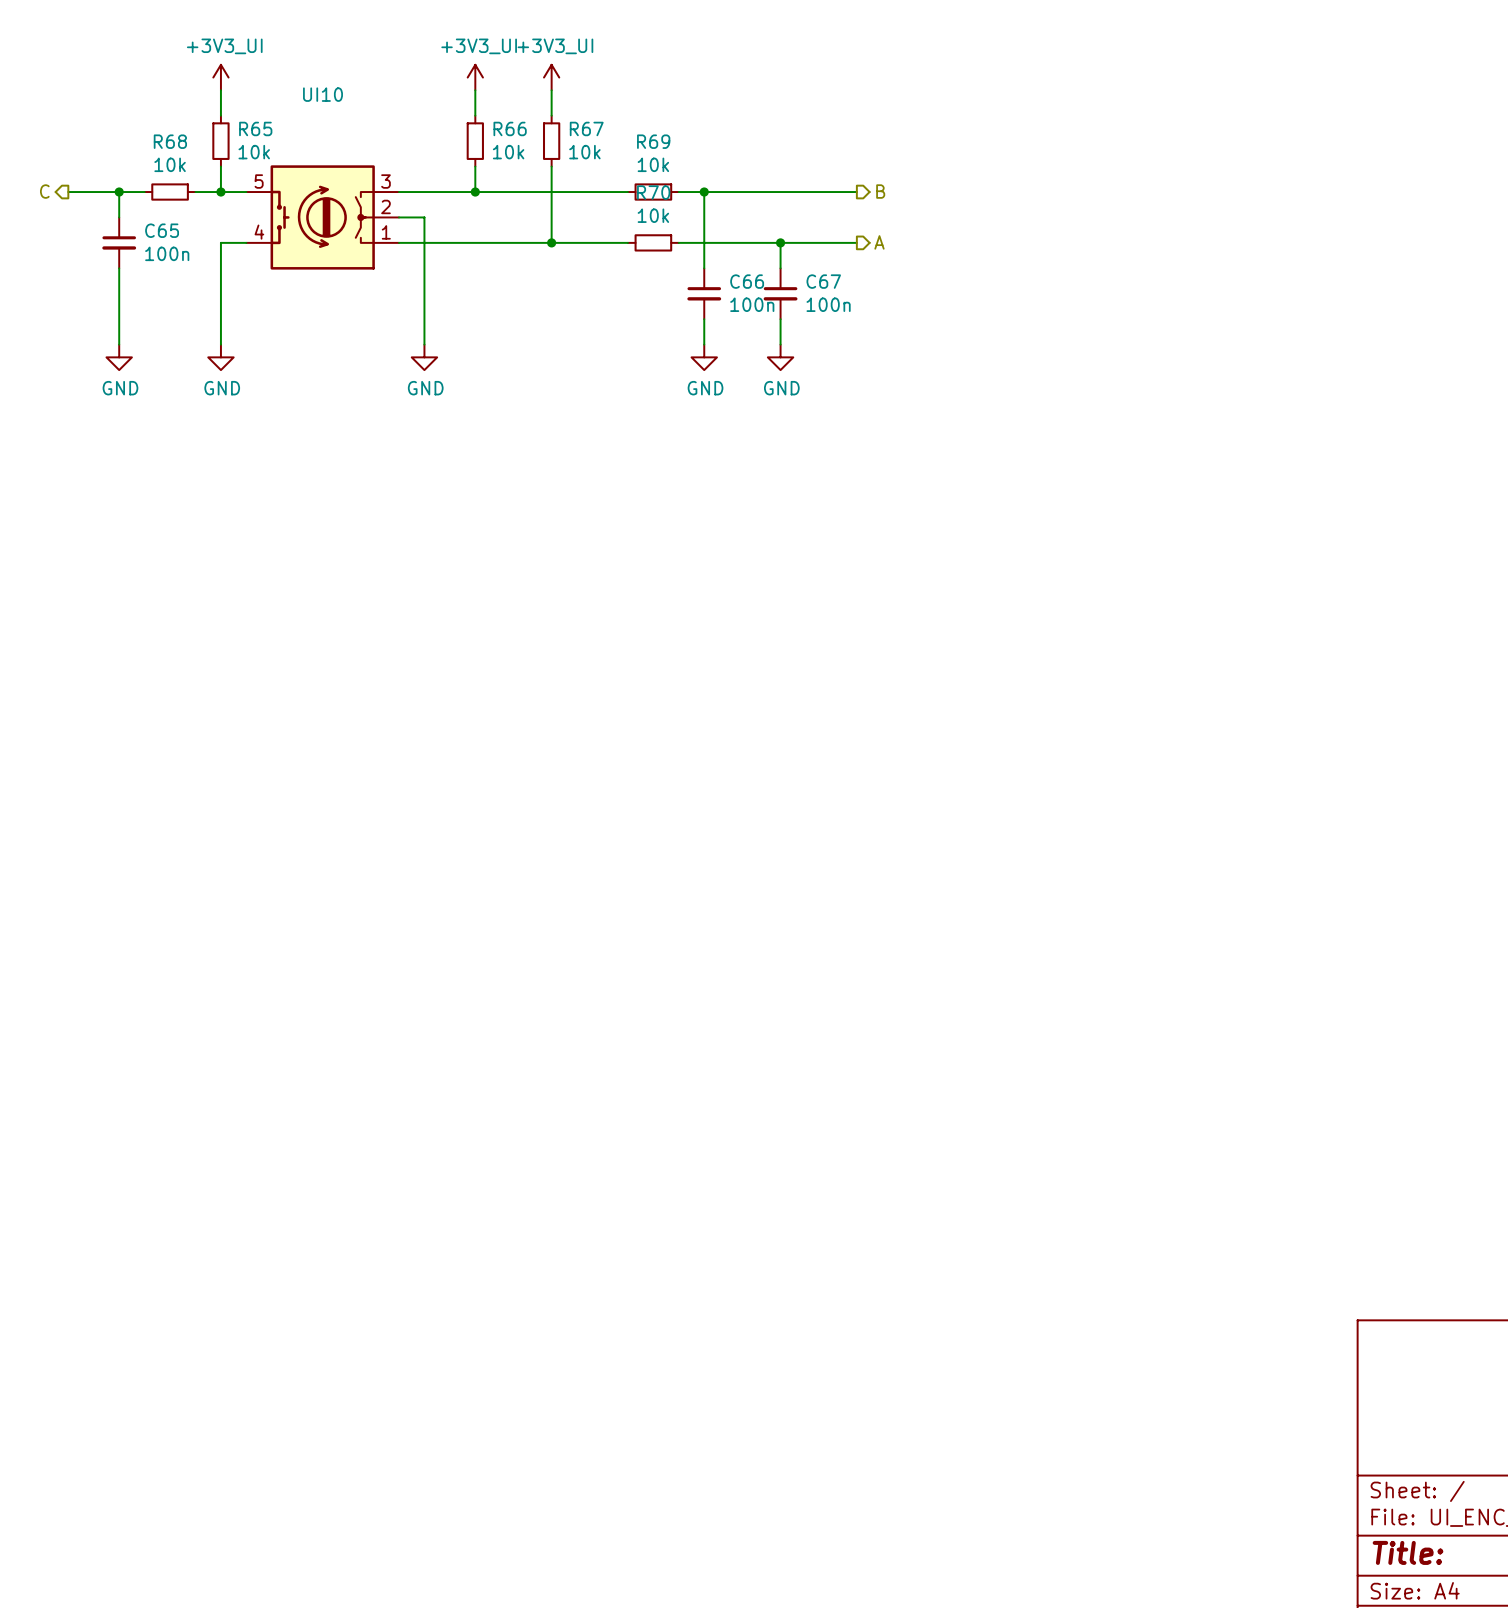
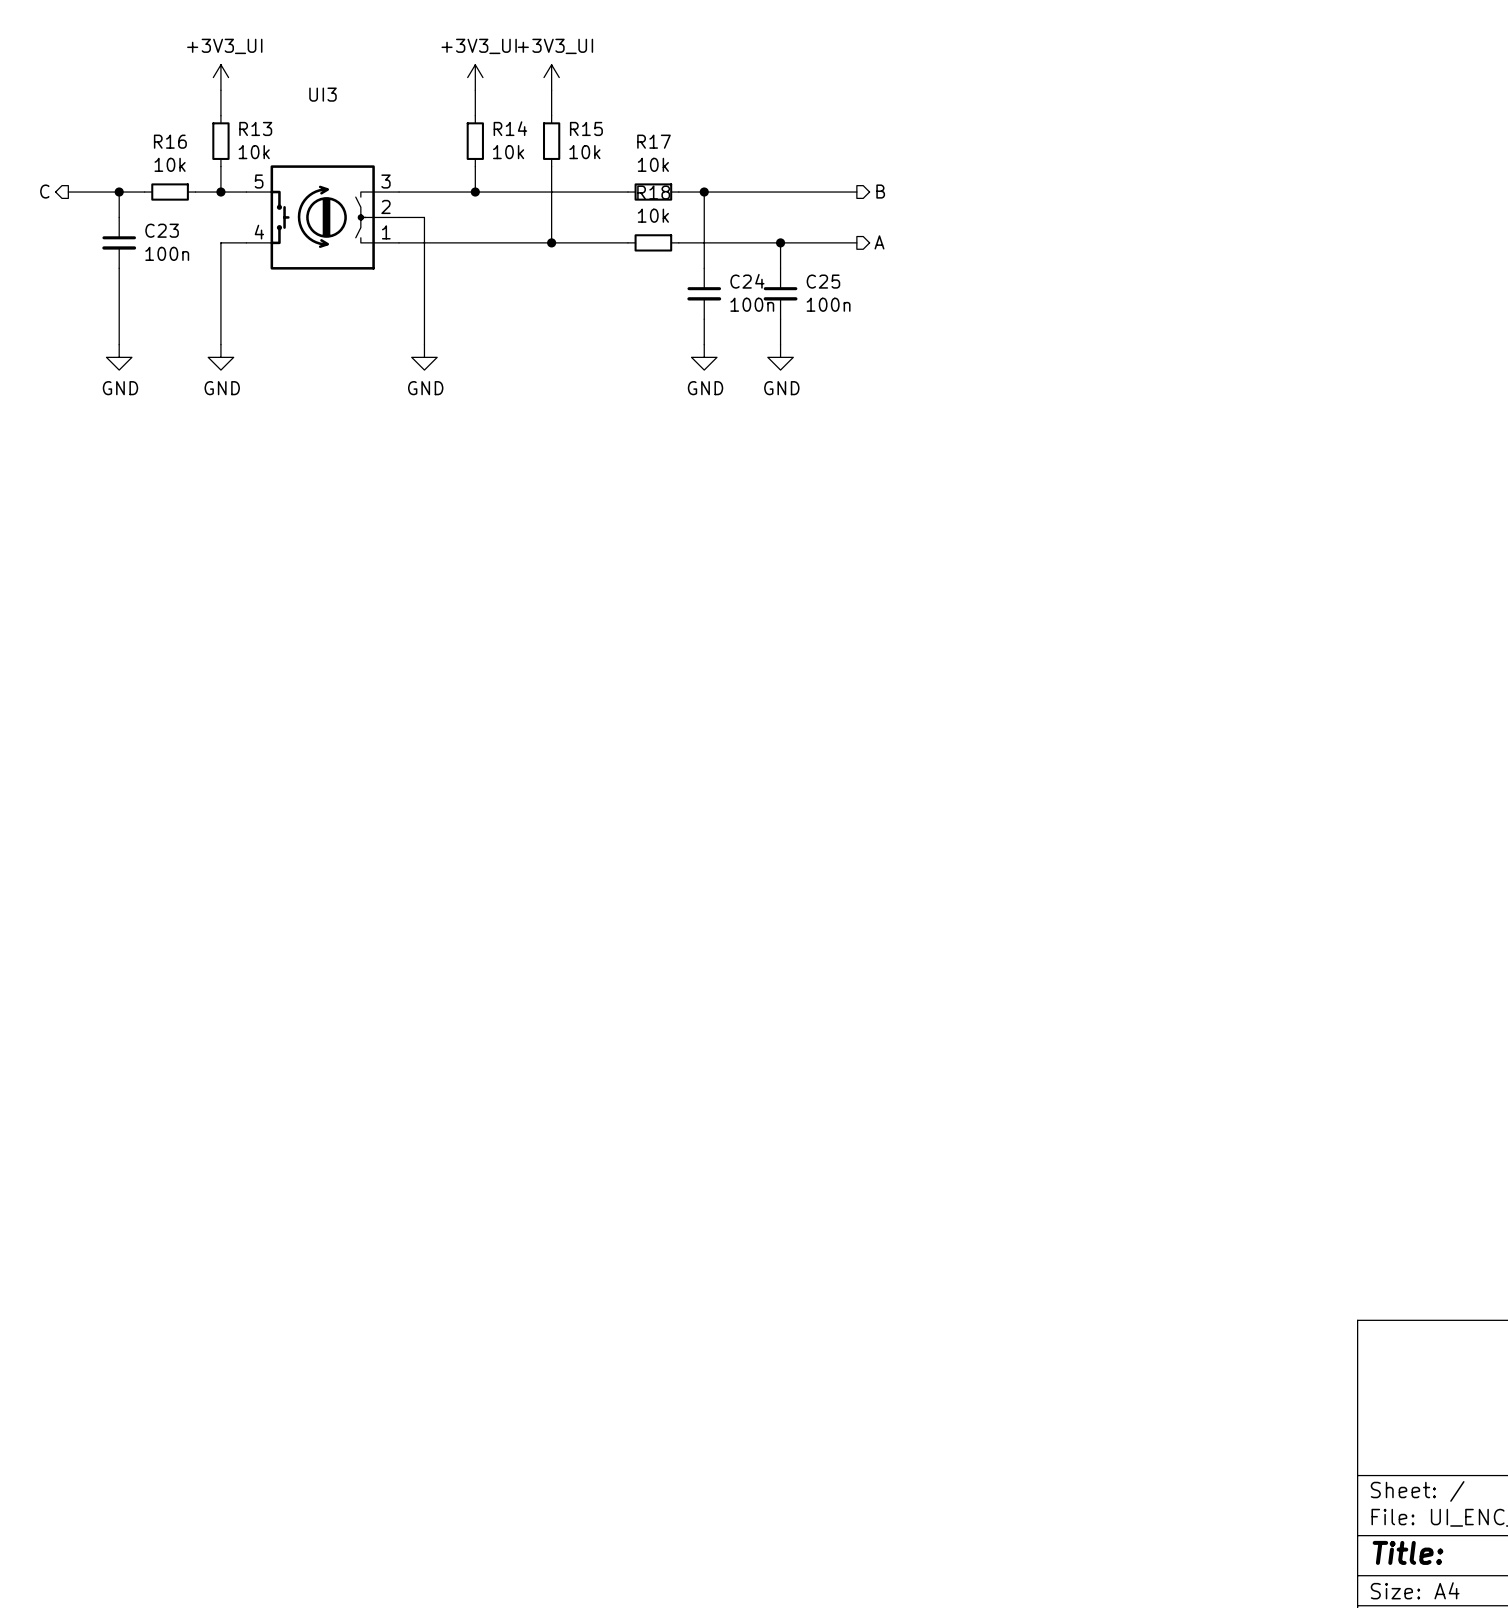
UI10 name: UI10 (323, 94) -> UI3 (323, 94)
R65 name: R65 (255, 128) -> R13 (255, 128)
R66 name: R66 (510, 128) -> R14 (510, 128)
R67 name: R67 (586, 128) -> R15 (586, 128)
R68 name: R68 (170, 141) -> R16 (170, 141)
R69 name: R69 (653, 141) -> R17 (653, 141)
R70 name: R70 (653, 192) -> R18 (653, 192)
C65 name: C65 (162, 230) -> C23 (162, 230)
C66 name: C66 (747, 281) -> C24 (747, 281)
C67 name: C67 (823, 281) -> C25 (823, 281)

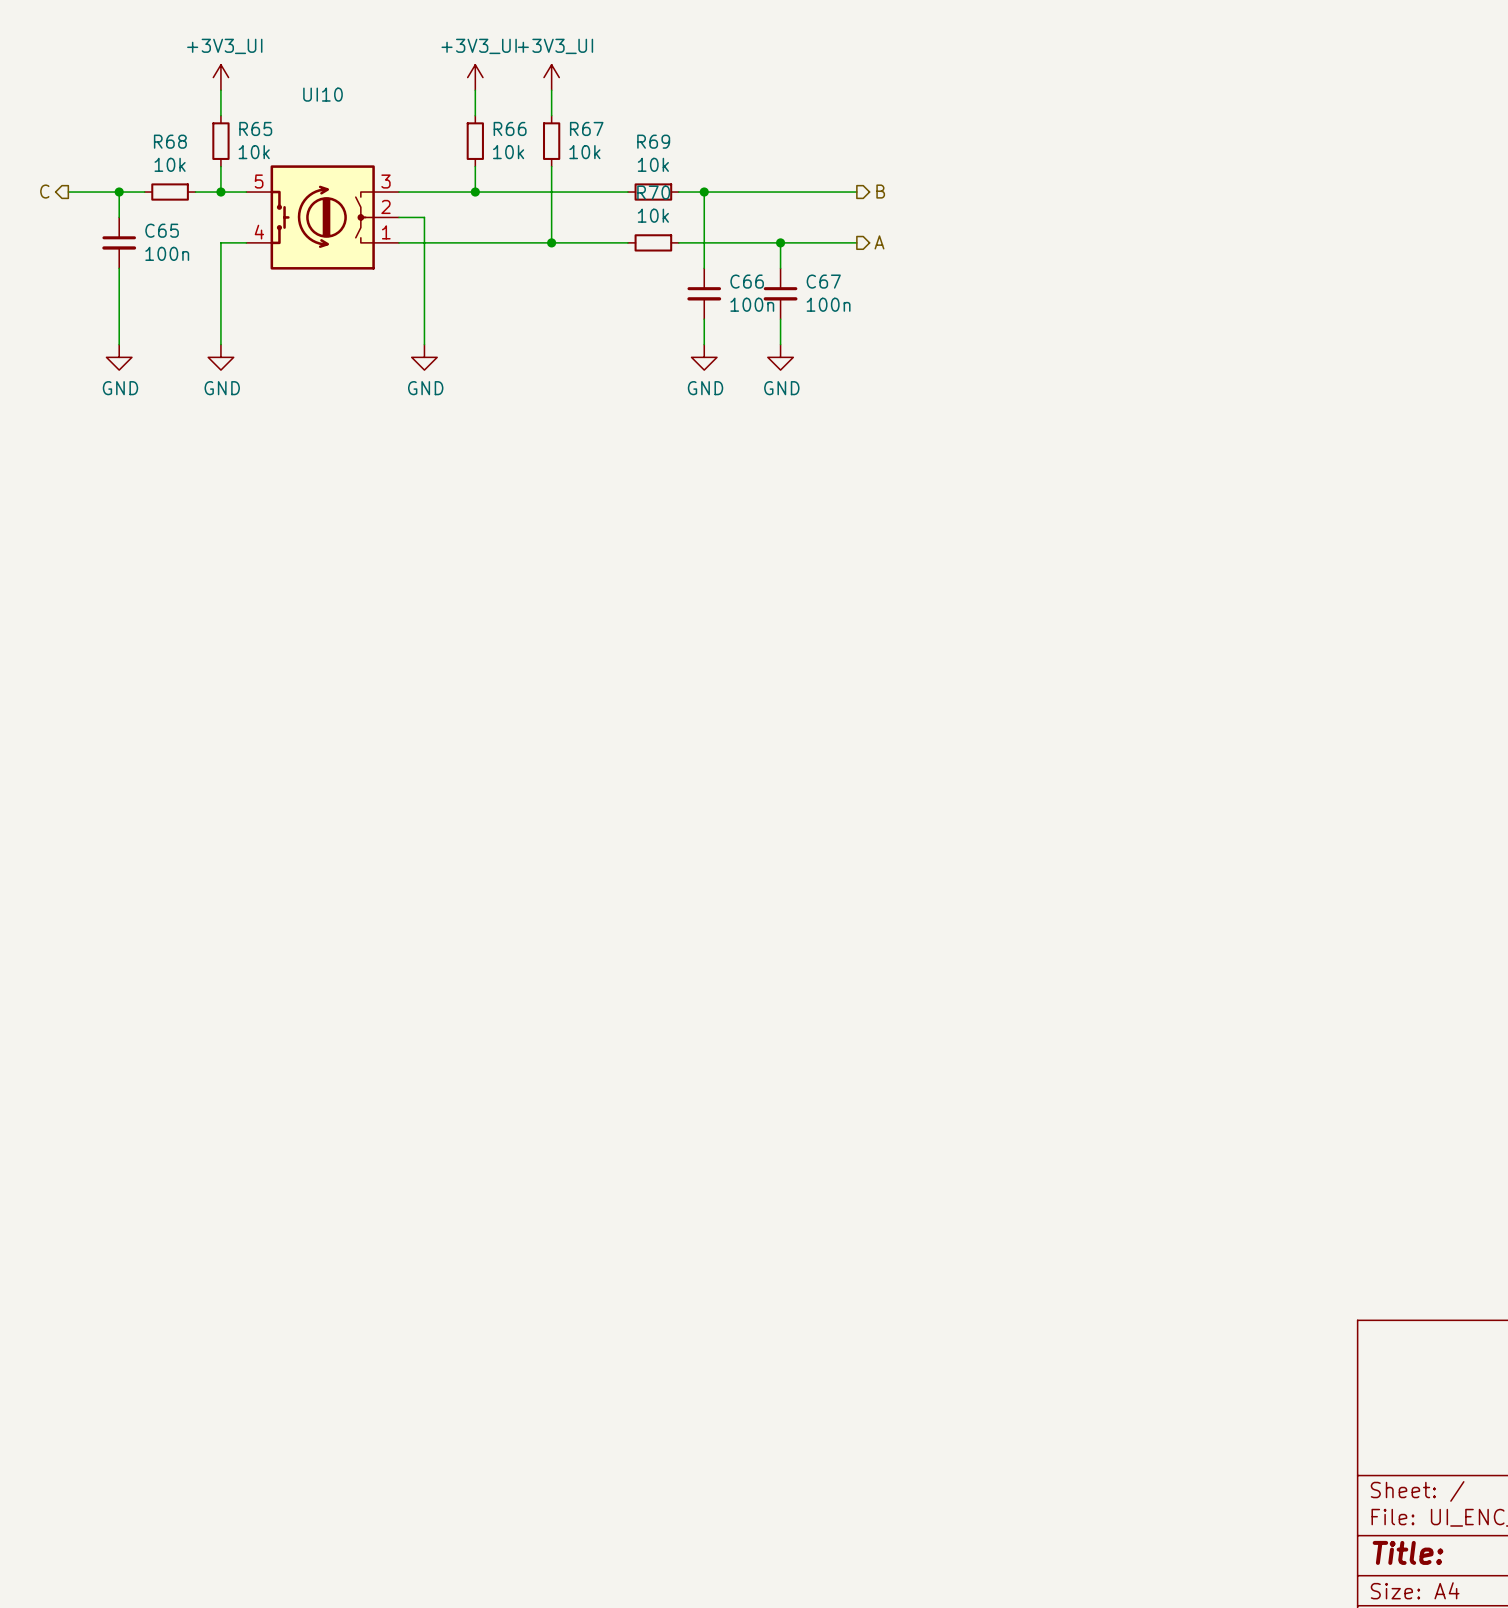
UI3 name: UI3 (323, 94) -> UI10 (323, 94)
R13 name: R13 (255, 128) -> R65 (255, 128)
R14 name: R14 (510, 128) -> R66 (510, 128)
R15 name: R15 (586, 128) -> R67 (586, 128)
R16 name: R16 (170, 141) -> R68 (170, 141)
R17 name: R17 (653, 141) -> R69 (653, 141)
R18 name: R18 (653, 192) -> R70 (653, 192)
C23 name: C23 (162, 230) -> C65 (162, 230)
C24 name: C24 (747, 281) -> C66 (747, 281)
C25 name: C25 (823, 281) -> C67 (823, 281)

